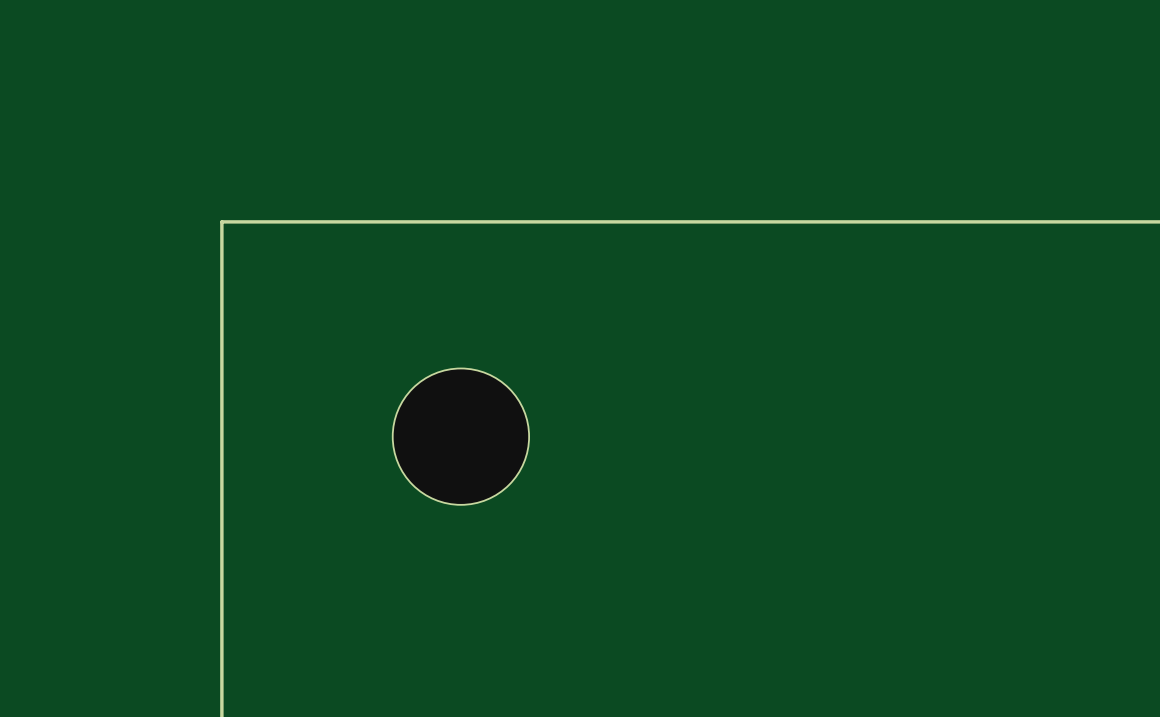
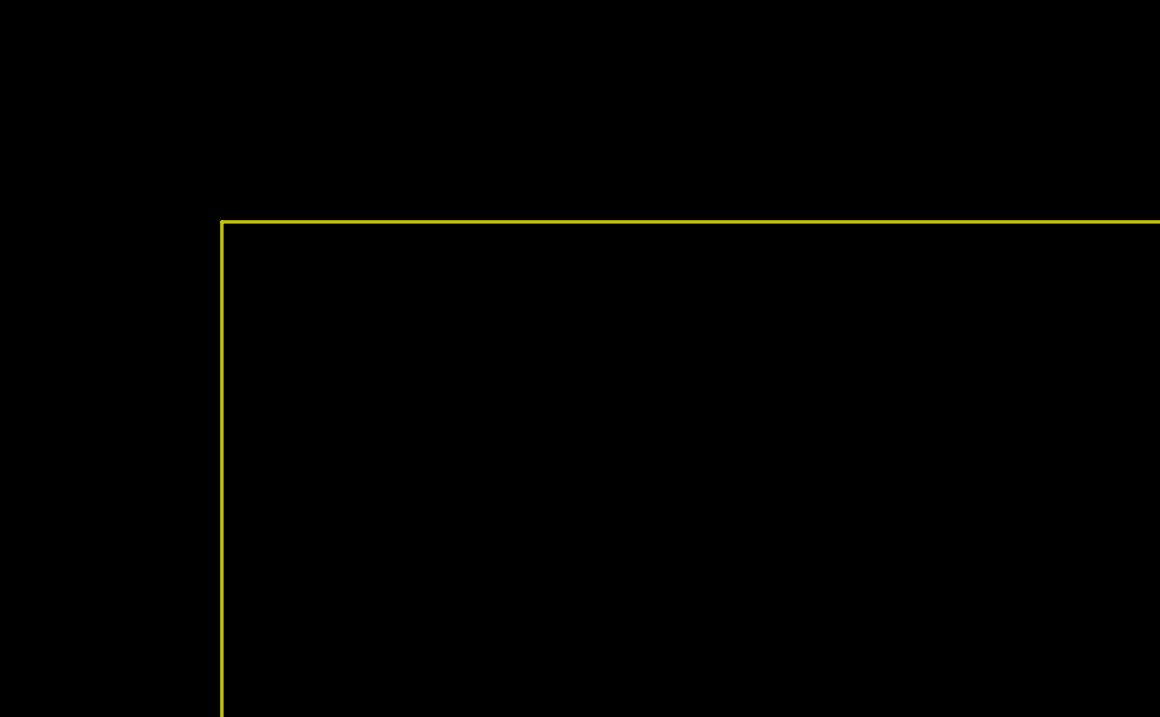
part: (460, 436) -> none

